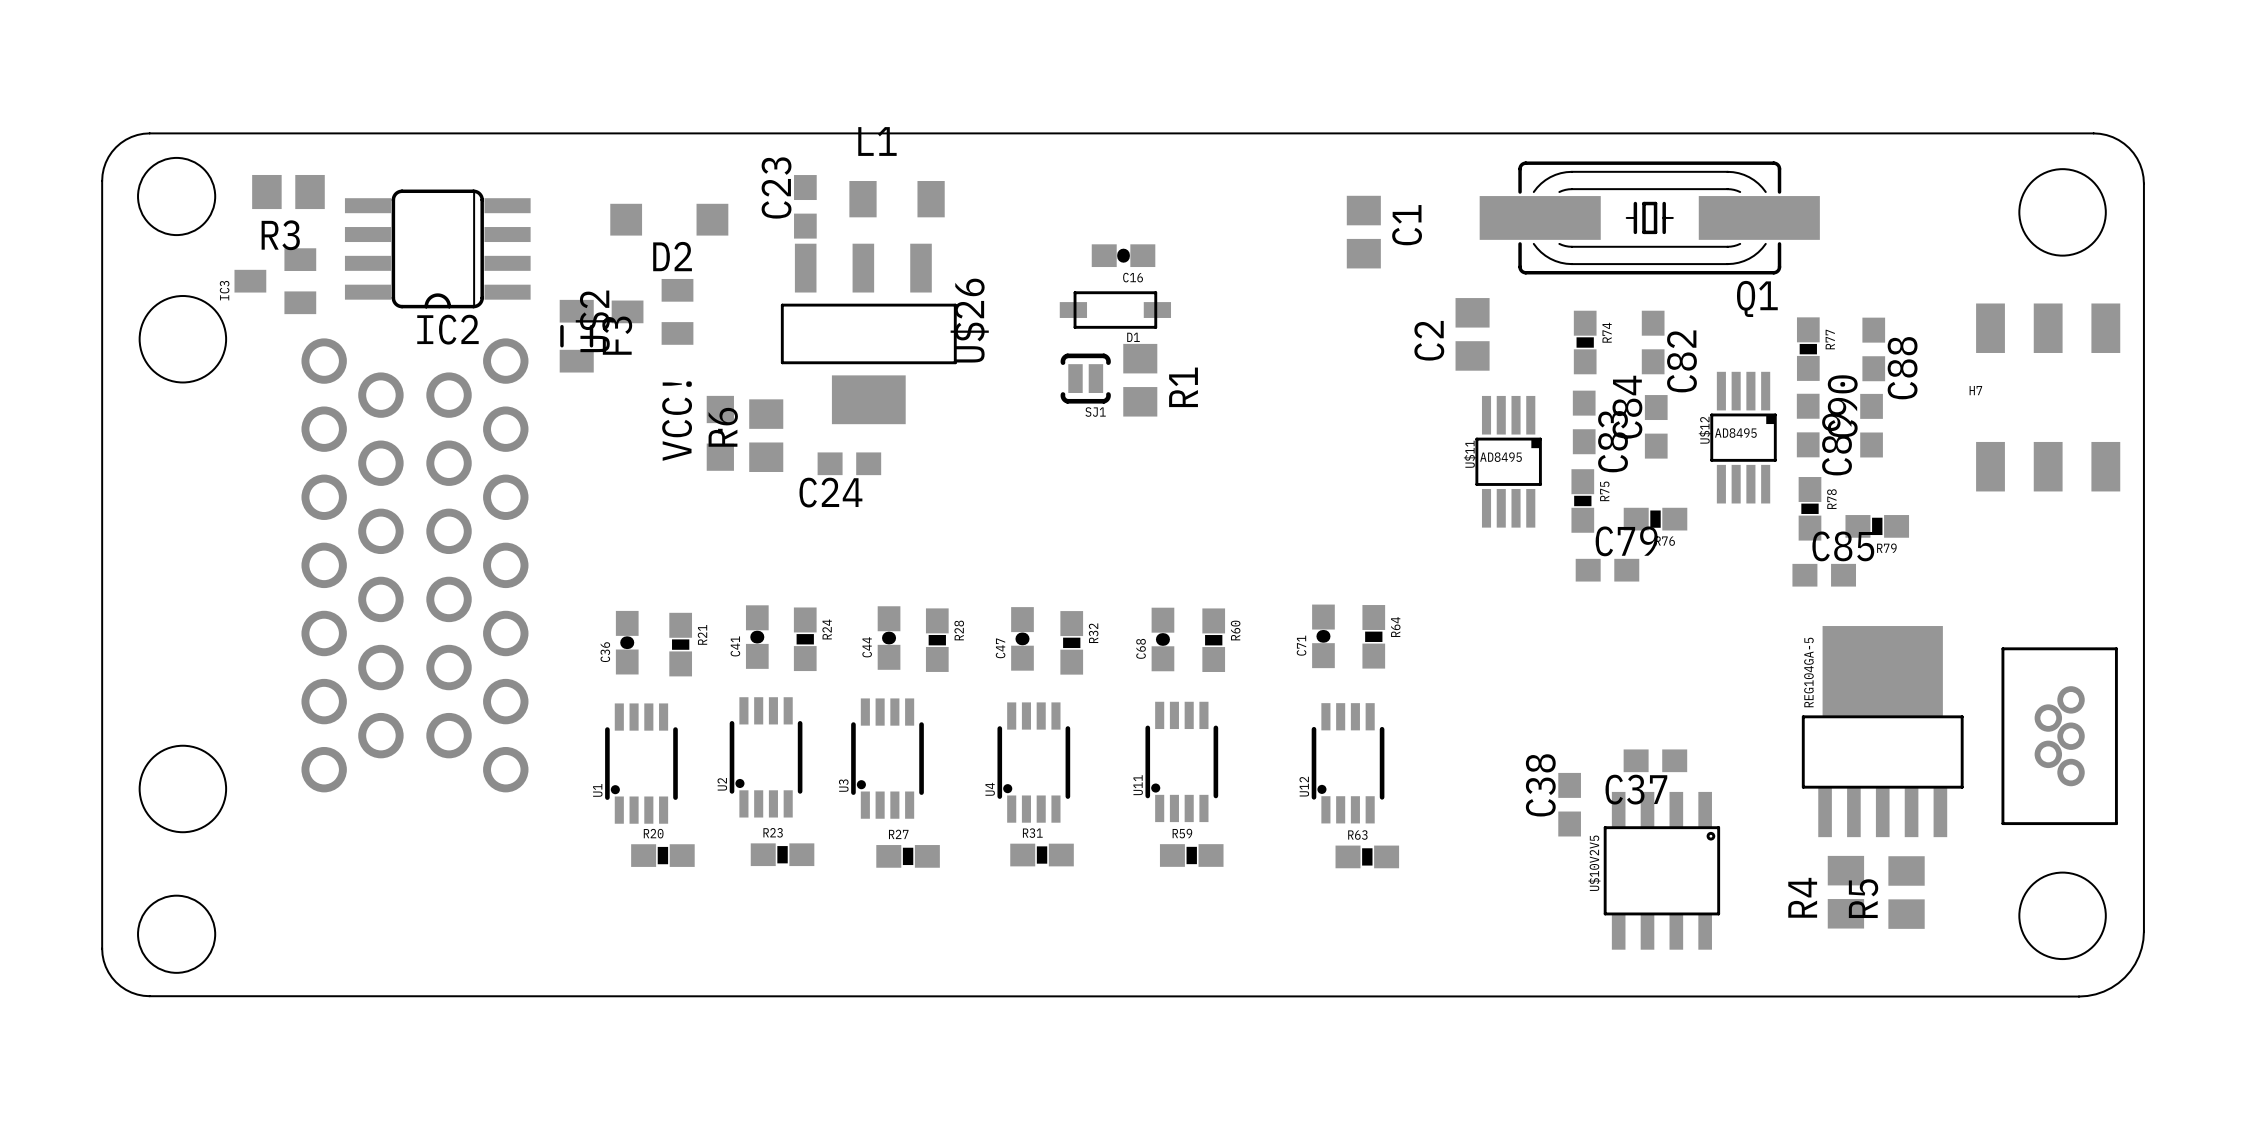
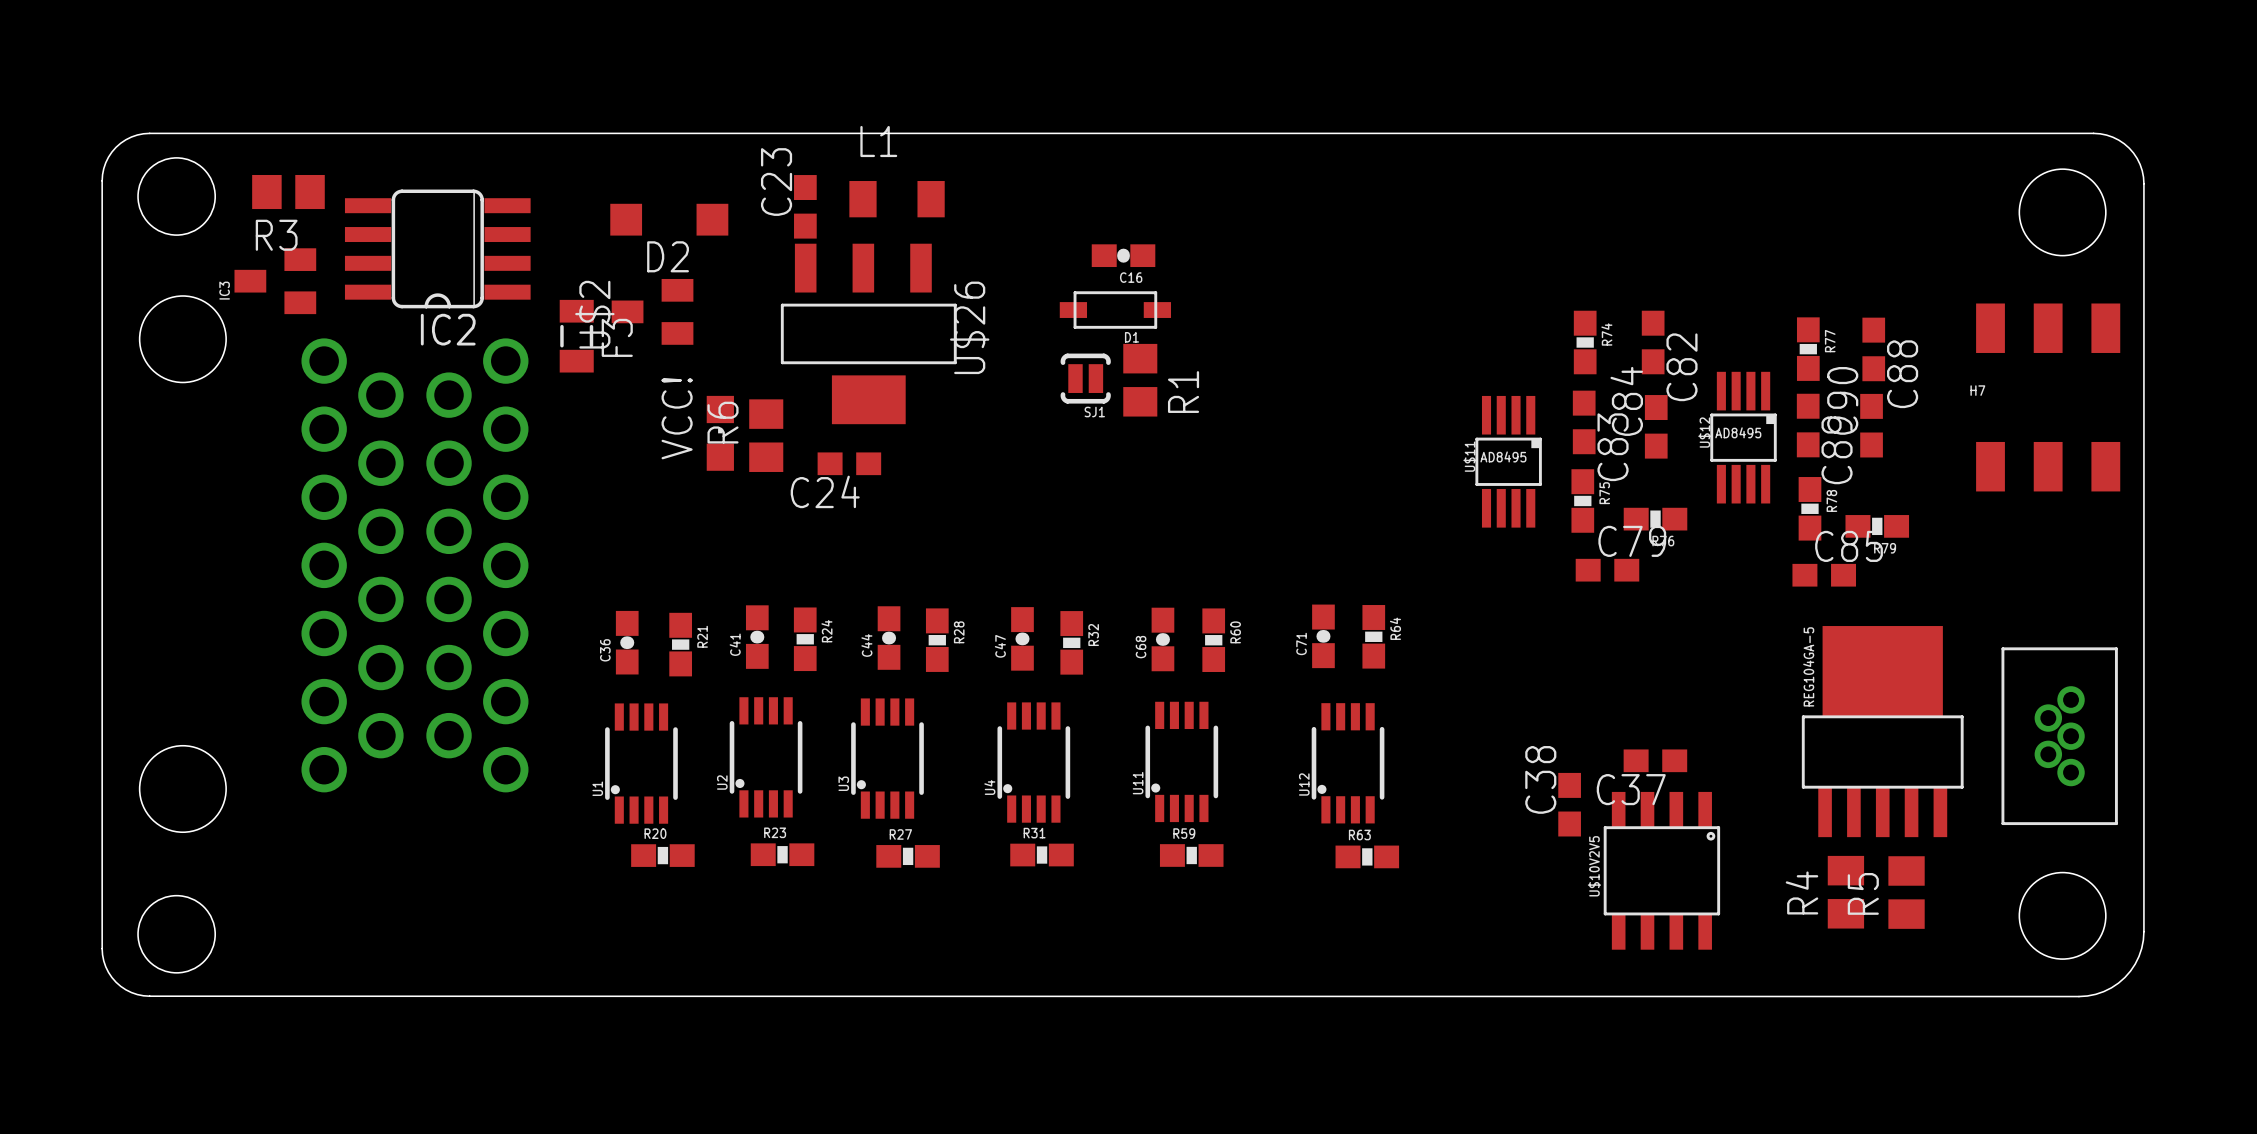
Q1: (1649, 217) -> none
C1: (1363, 232) -> none
C2: (1472, 334) -> none

